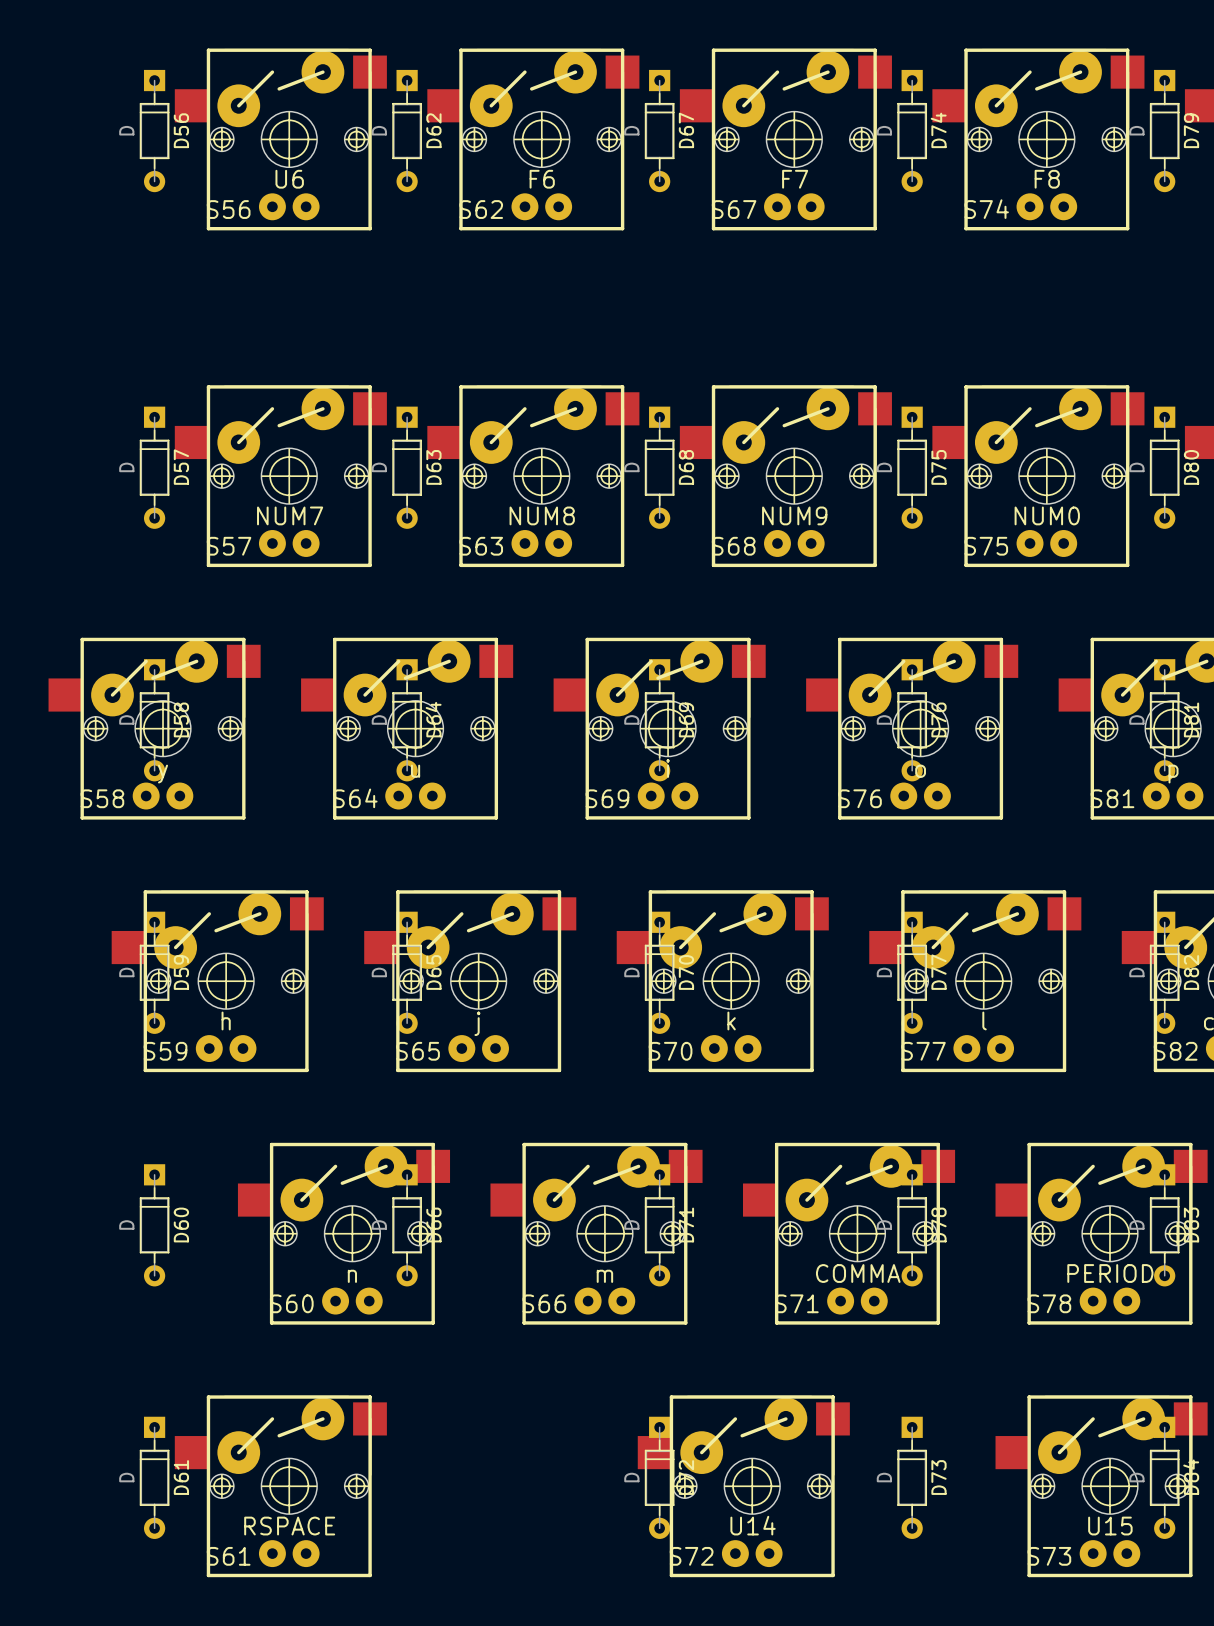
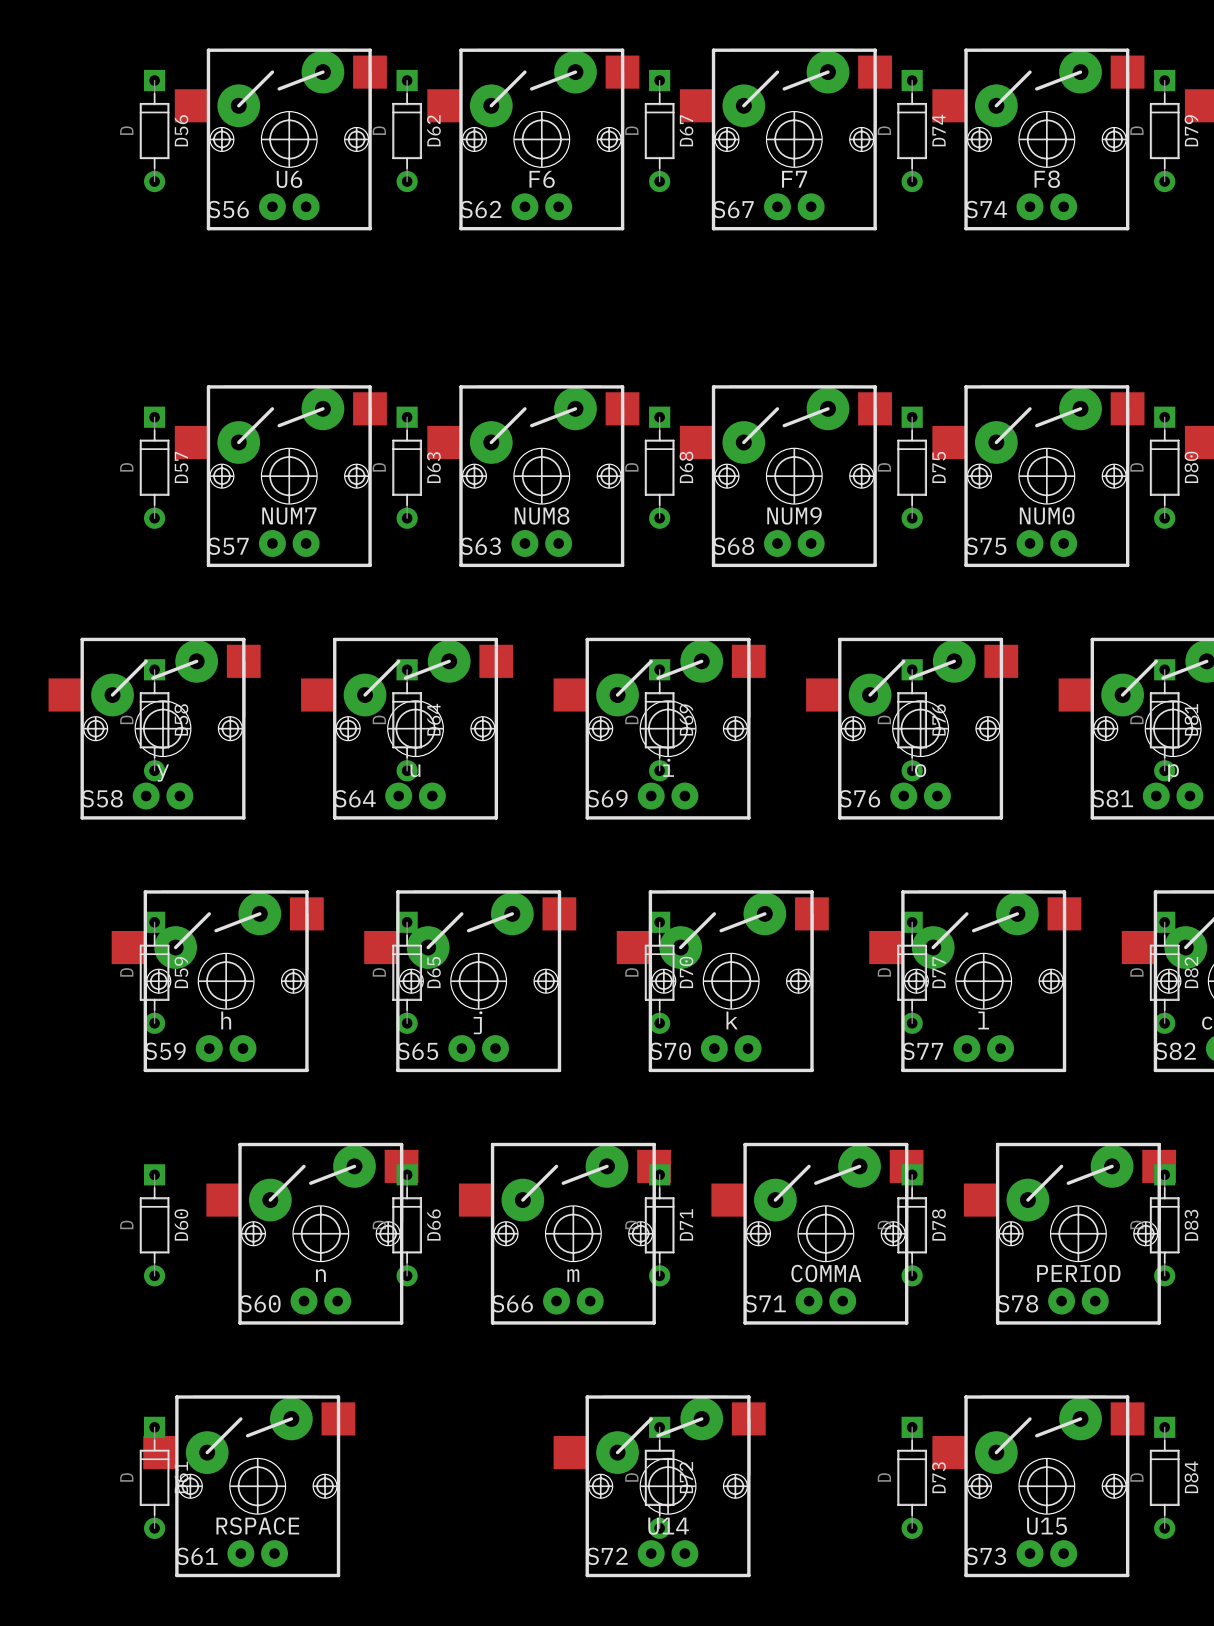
S66 footprint: [490, 1142, 703, 1325] -> [458, 1142, 671, 1325]
S60 position: (343, 1233) -> (312, 1233)
S71 position: (849, 1233) -> (817, 1233)
S78 position: (1101, 1233) -> (1070, 1233)
S61 position: (280, 1486) -> (249, 1486)
S72 position: (743, 1486) -> (659, 1486)
S73 position: (1101, 1486) -> (1038, 1486)

